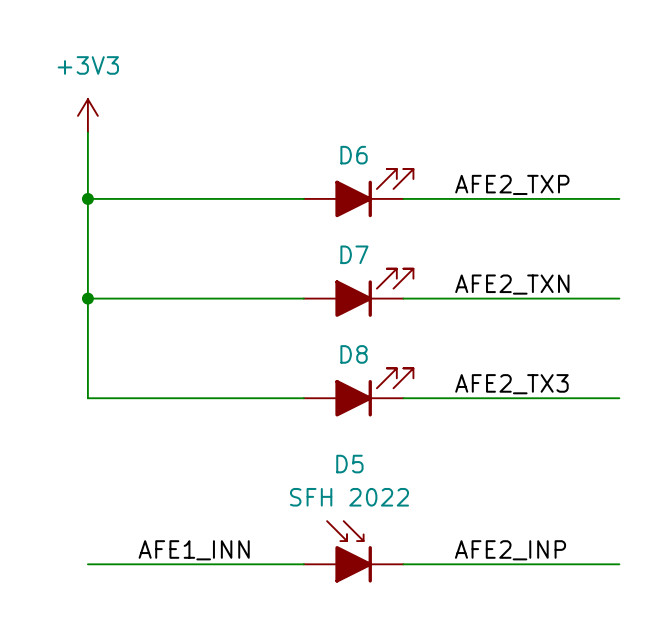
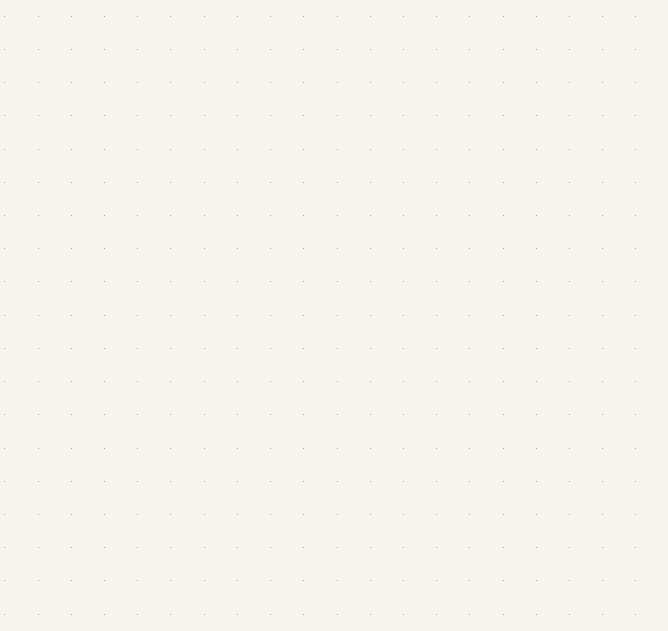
power symbol: +3V3 (87, 115) -> none
wire: (87, 132) (87, 398) (303, 398) -> none
label: AFE2_TXP (512, 184) -> none
D6: (358, 193) -> none
wire: (87, 198) (303, 198) -> none
junction: (87, 198) -> none
wire: (403, 198) (619, 198) -> none
label: AFE2_TXN (512, 284) -> none
D7: (358, 292) -> none
wire: (87, 298) (303, 298) -> none
junction: (87, 298) -> none
wire: (403, 298) (619, 298) -> none
label: AFE2_TX3 (511, 384) -> none
D8: (358, 392) -> none
wire: (403, 398) (619, 398) -> none
label: AFE1_INN (194, 550) -> none
label: AFE2_INP (510, 550) -> none
D5: SFH 2022 (353, 551) -> none
wire: (87, 564) (303, 564) -> none
wire: (403, 564) (619, 564) -> none

